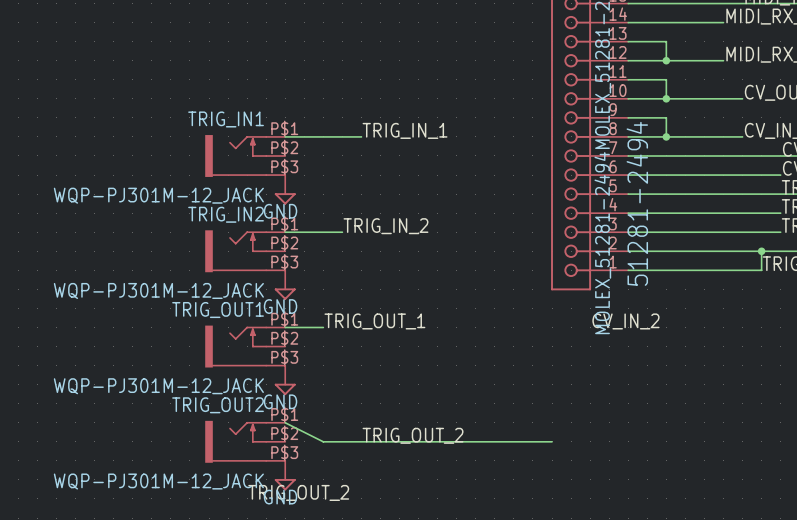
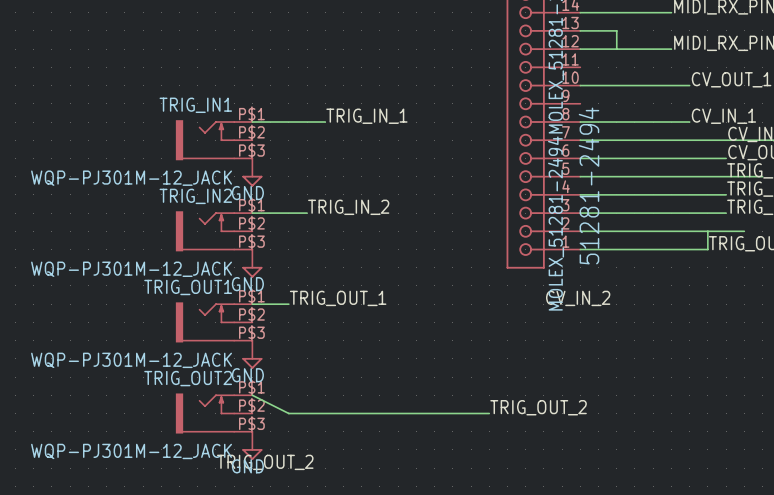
junction: (666, 60) -> none
wire: (628, 79) (666, 79) (666, 98) -> none
junction: (666, 98) -> none
wire: (628, 117) (666, 117) (666, 136) -> none
junction: (666, 136) -> none
junction: (761, 251) -> none
label position: TRIG_OUT_2 (413, 435) -> TRIG_OUT_2 (538, 407)
wire: (532, 441) (552, 441) -> none

